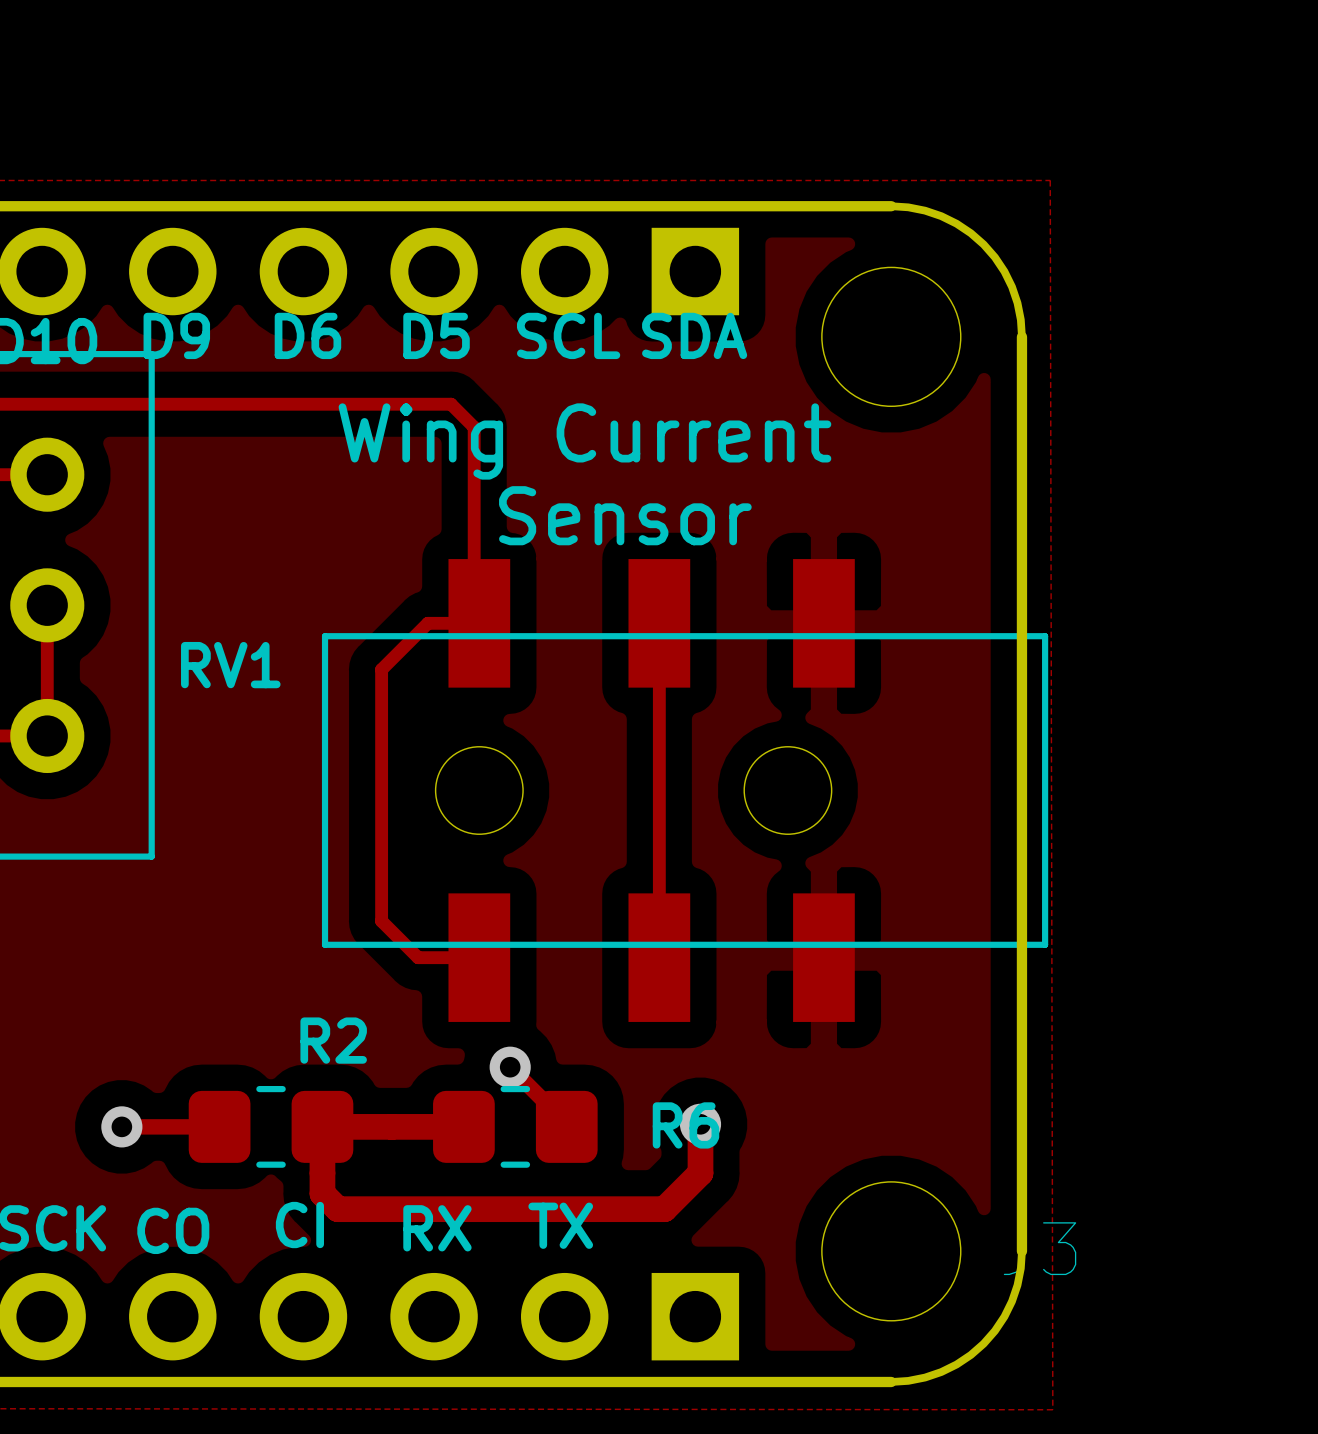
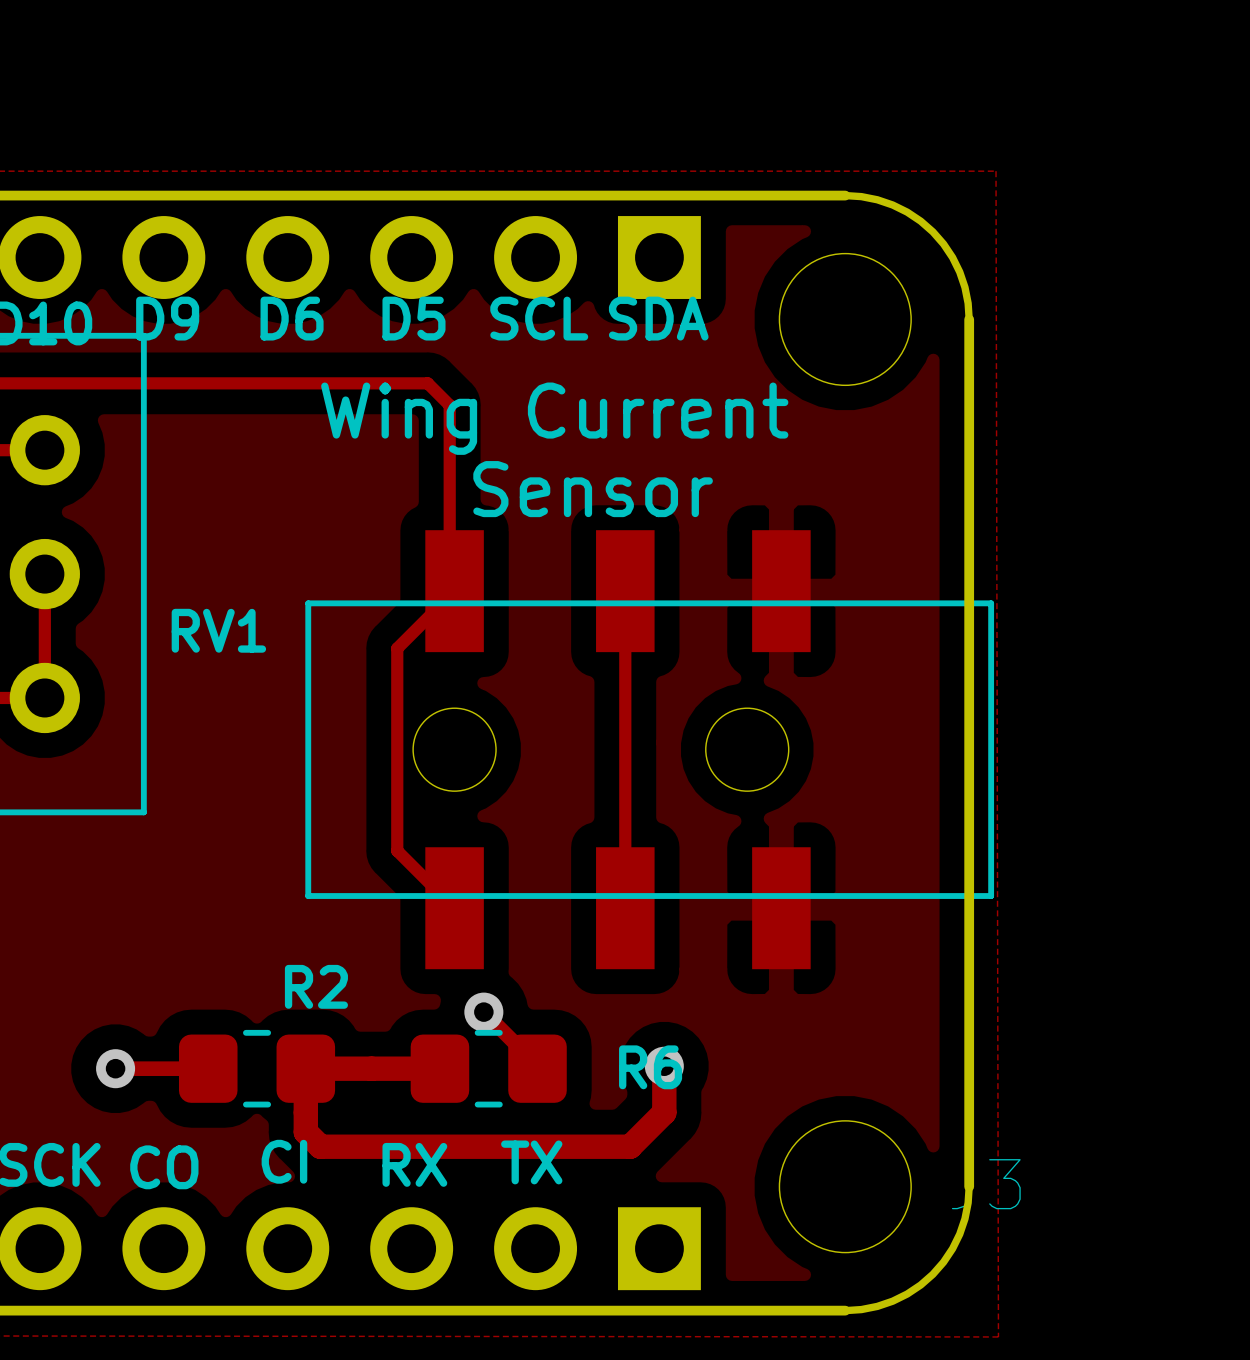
track: (479, 623) (427, 623) (381, 669) (381, 921) (418, 957) (479, 957) -> (454, 591) (397, 648) (397, 850) (454, 908)

